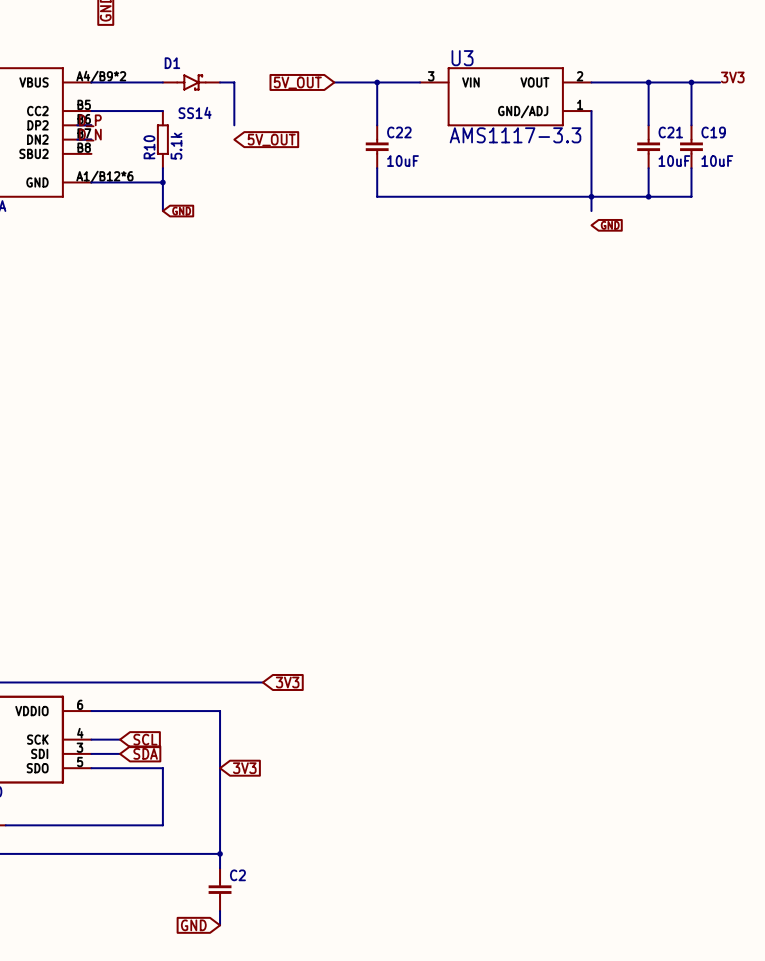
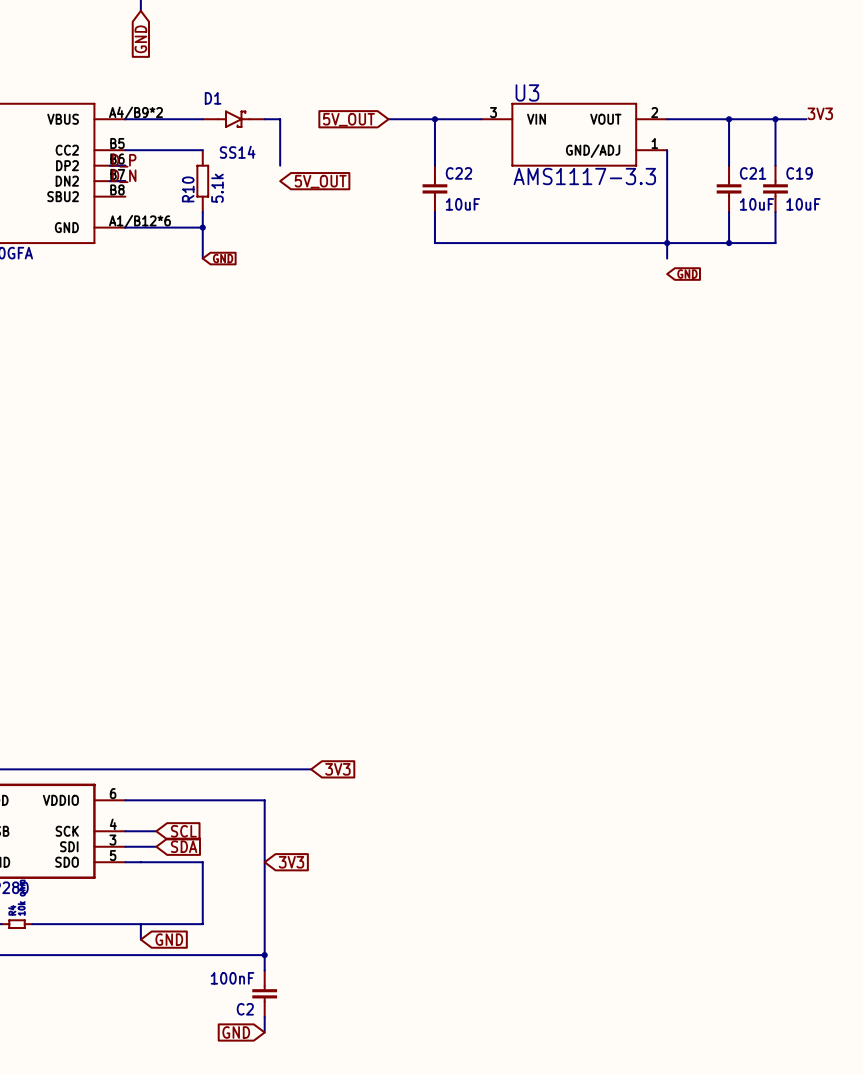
wire: none -> (140, 924) (140, 939)
global label: none -> GND (169, 939)
C2 value: none -> 100nF (232, 978)
C2 name position: C2 (237, 875) -> C2 (245, 1009)

